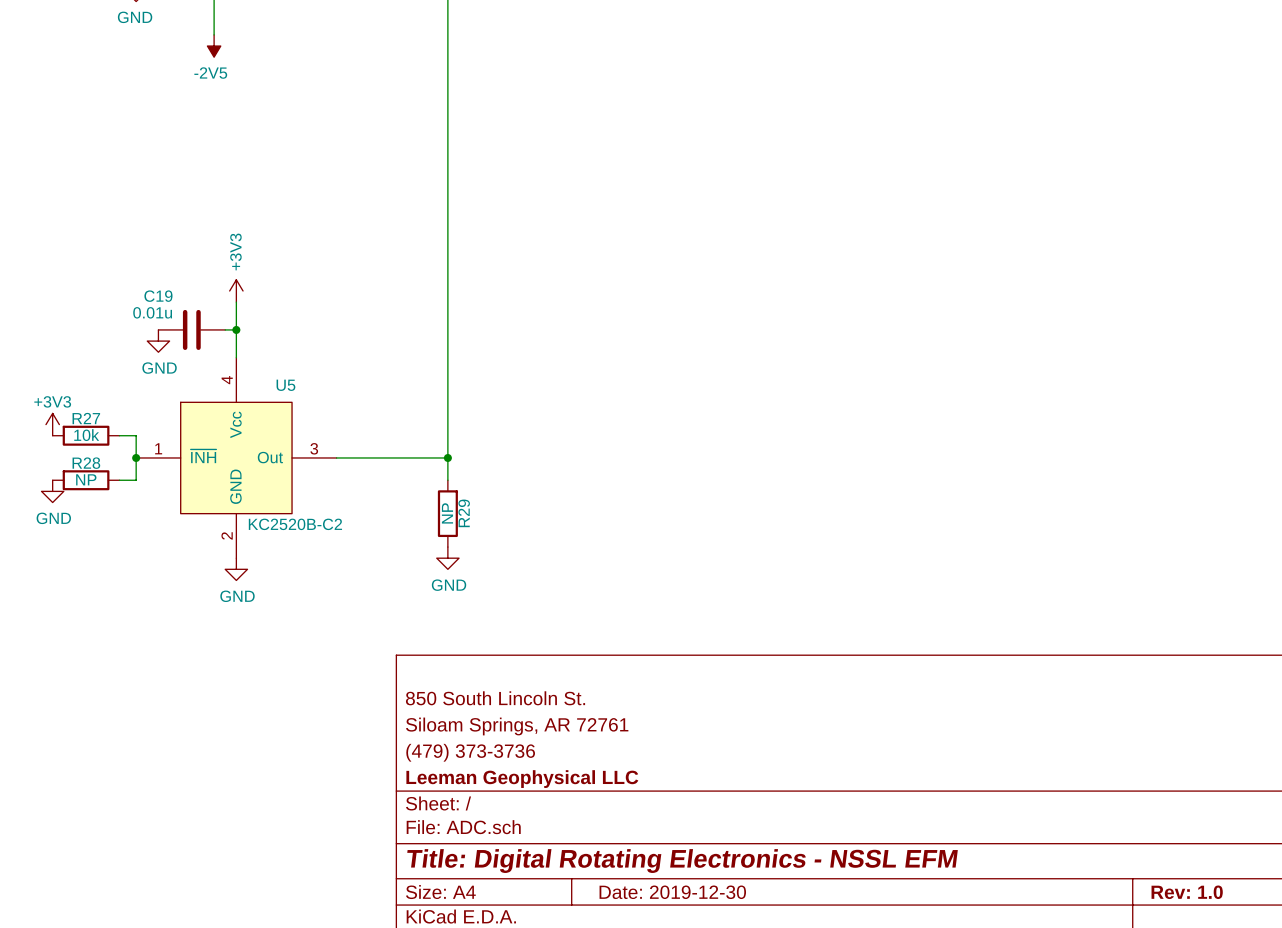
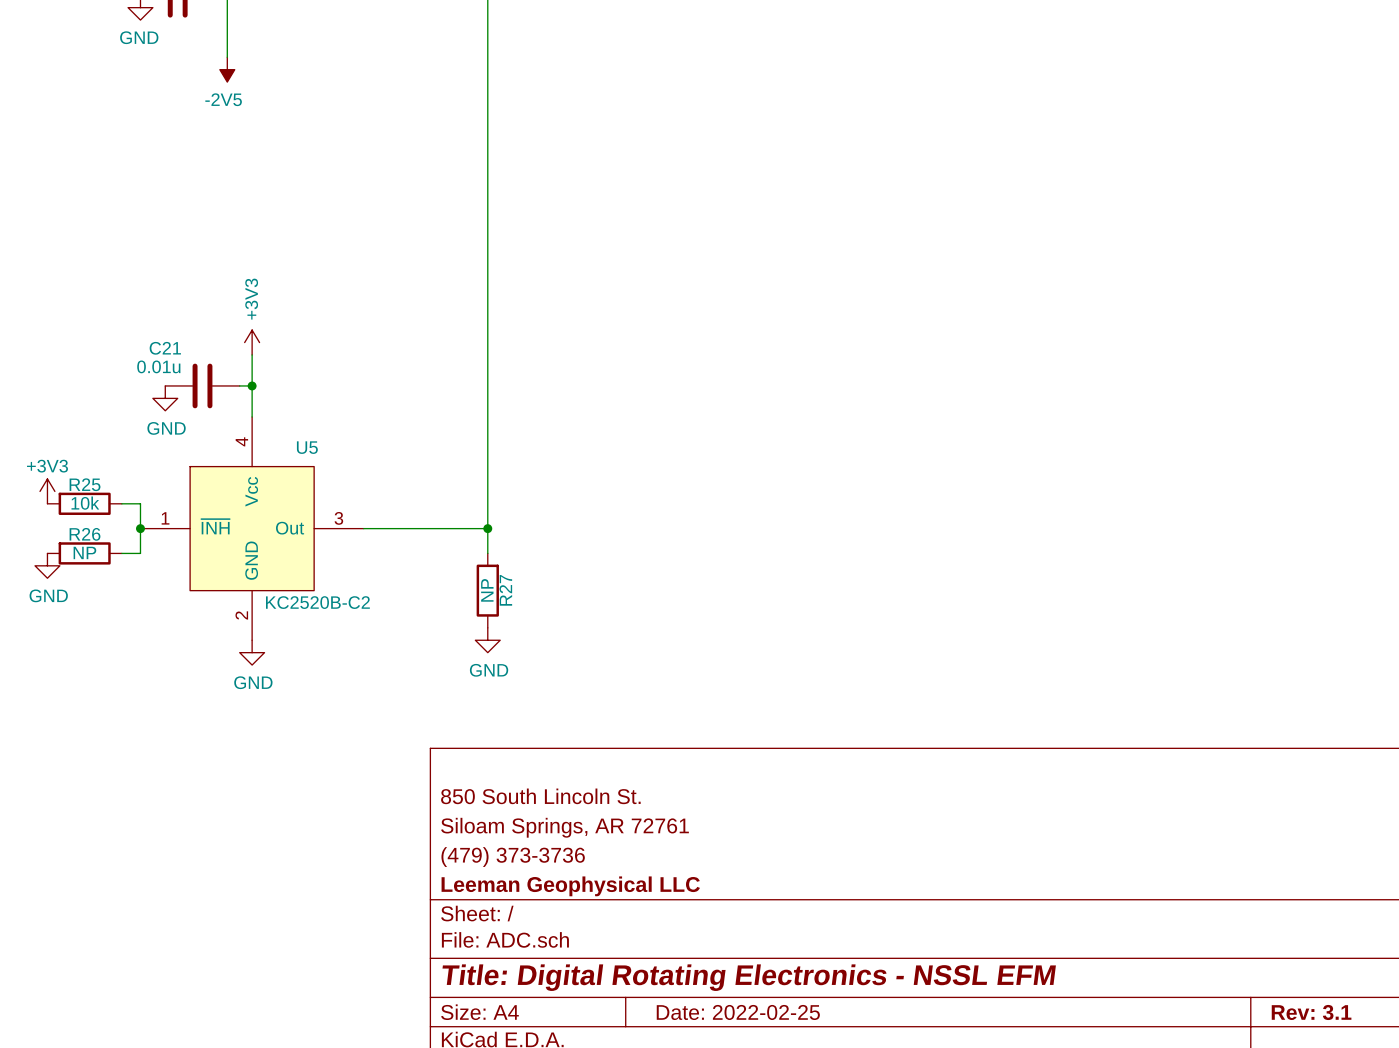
C19 name: C19 (158, 296) -> C21 (165, 348)
R27 name: R27 (86, 418) -> R25 (85, 484)
R28 name: R28 (86, 463) -> R26 (85, 534)
R29 name: R29 (464, 513) -> R27 (505, 590)
title block: Date: 2019-12-30 (672, 892) -> Date: 2022-02-25 (738, 1012)
title block: Rev: 1.0 (1187, 892) -> Rev: 3.1 (1311, 1012)

